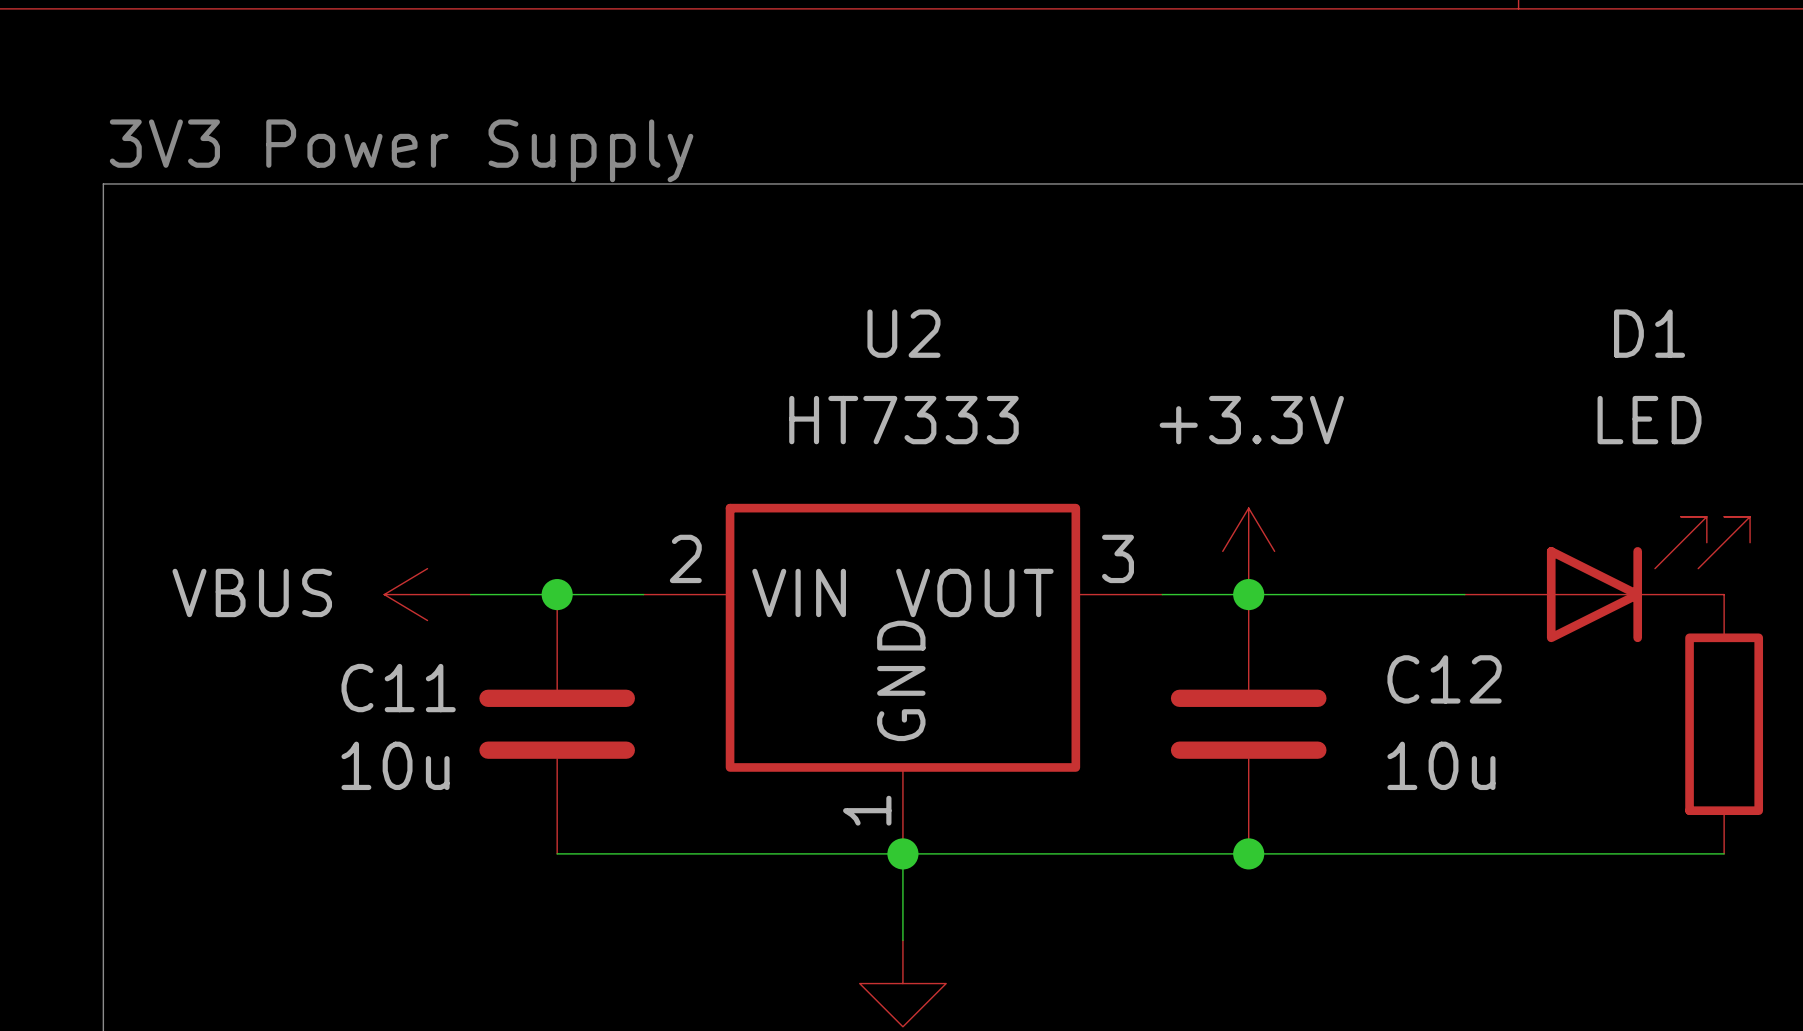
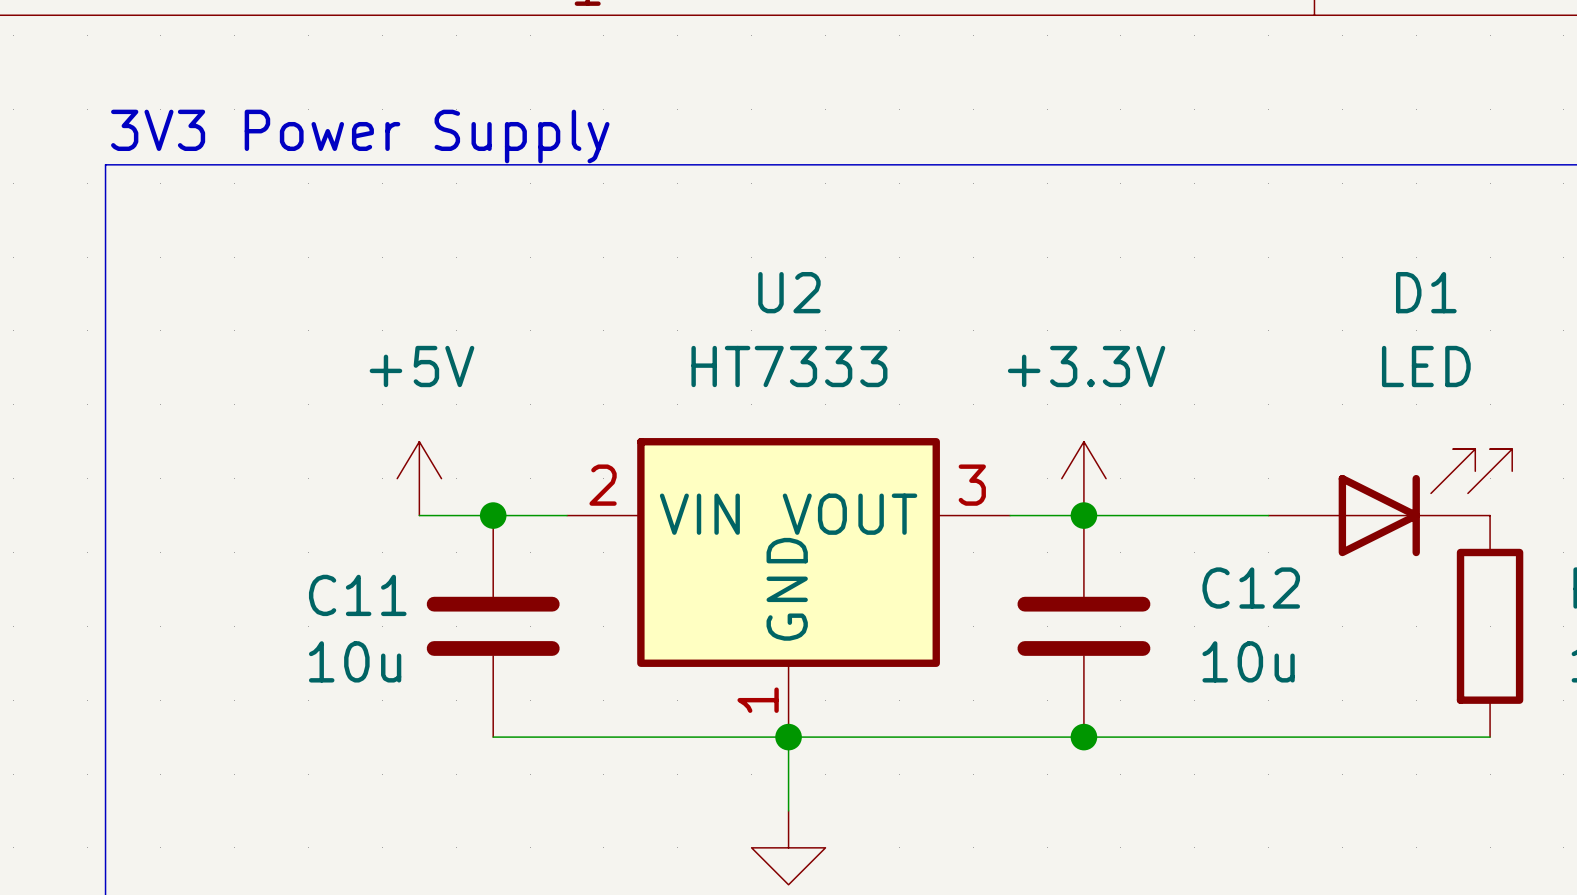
power symbol: none -> +5V (419, 478)
power symbol: VBUS (427, 594) -> none

